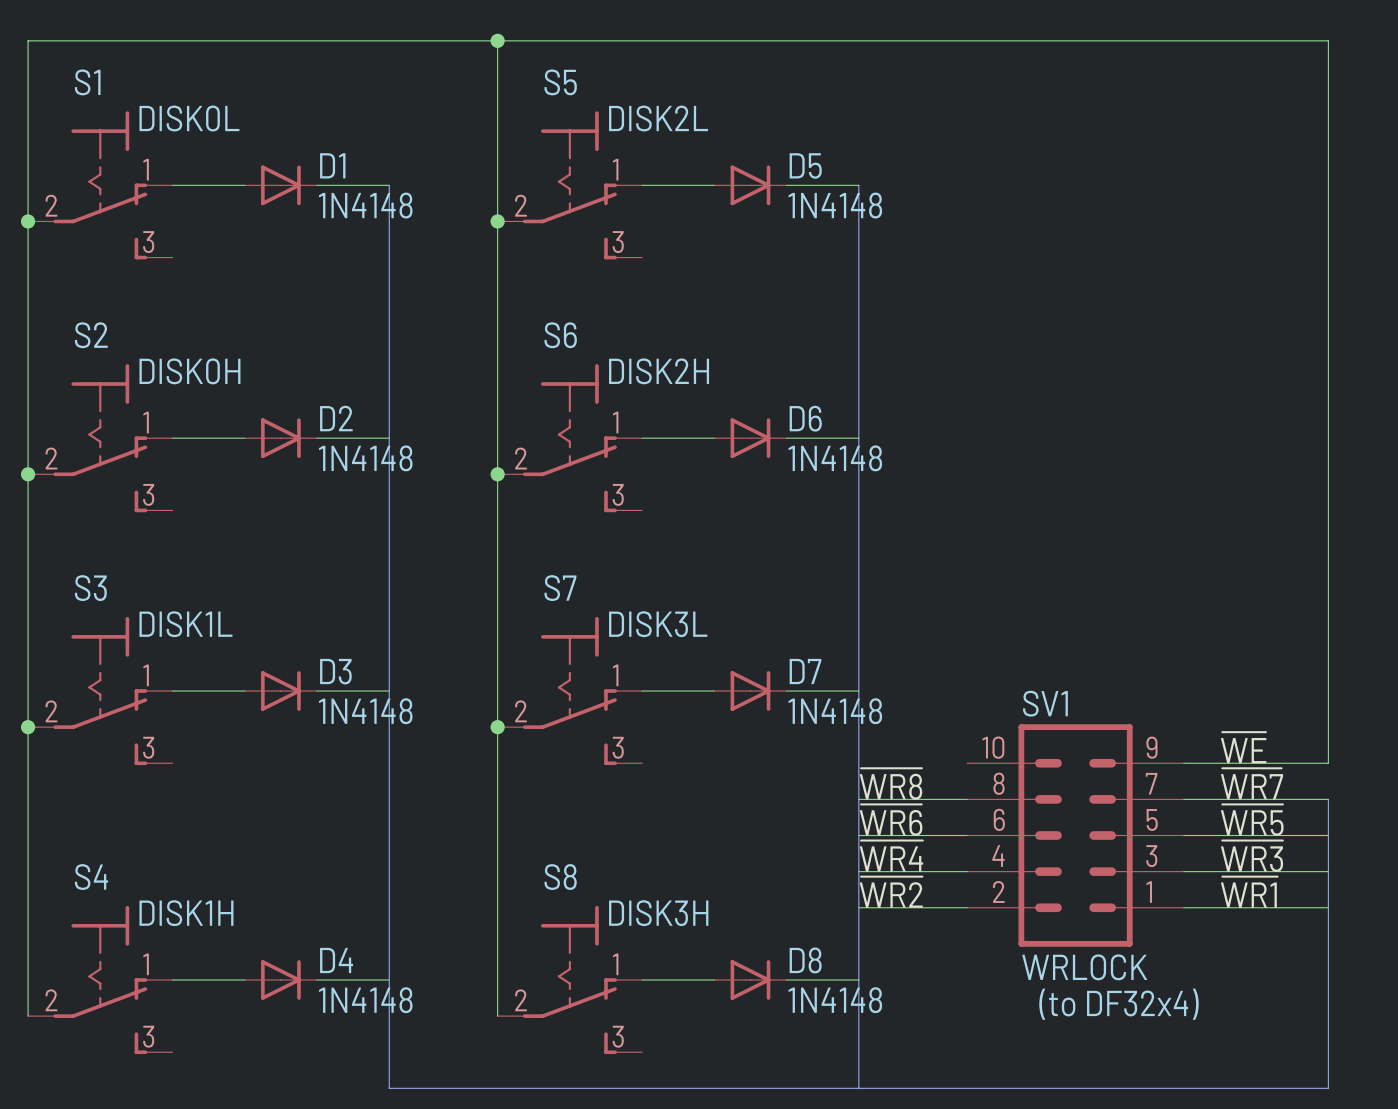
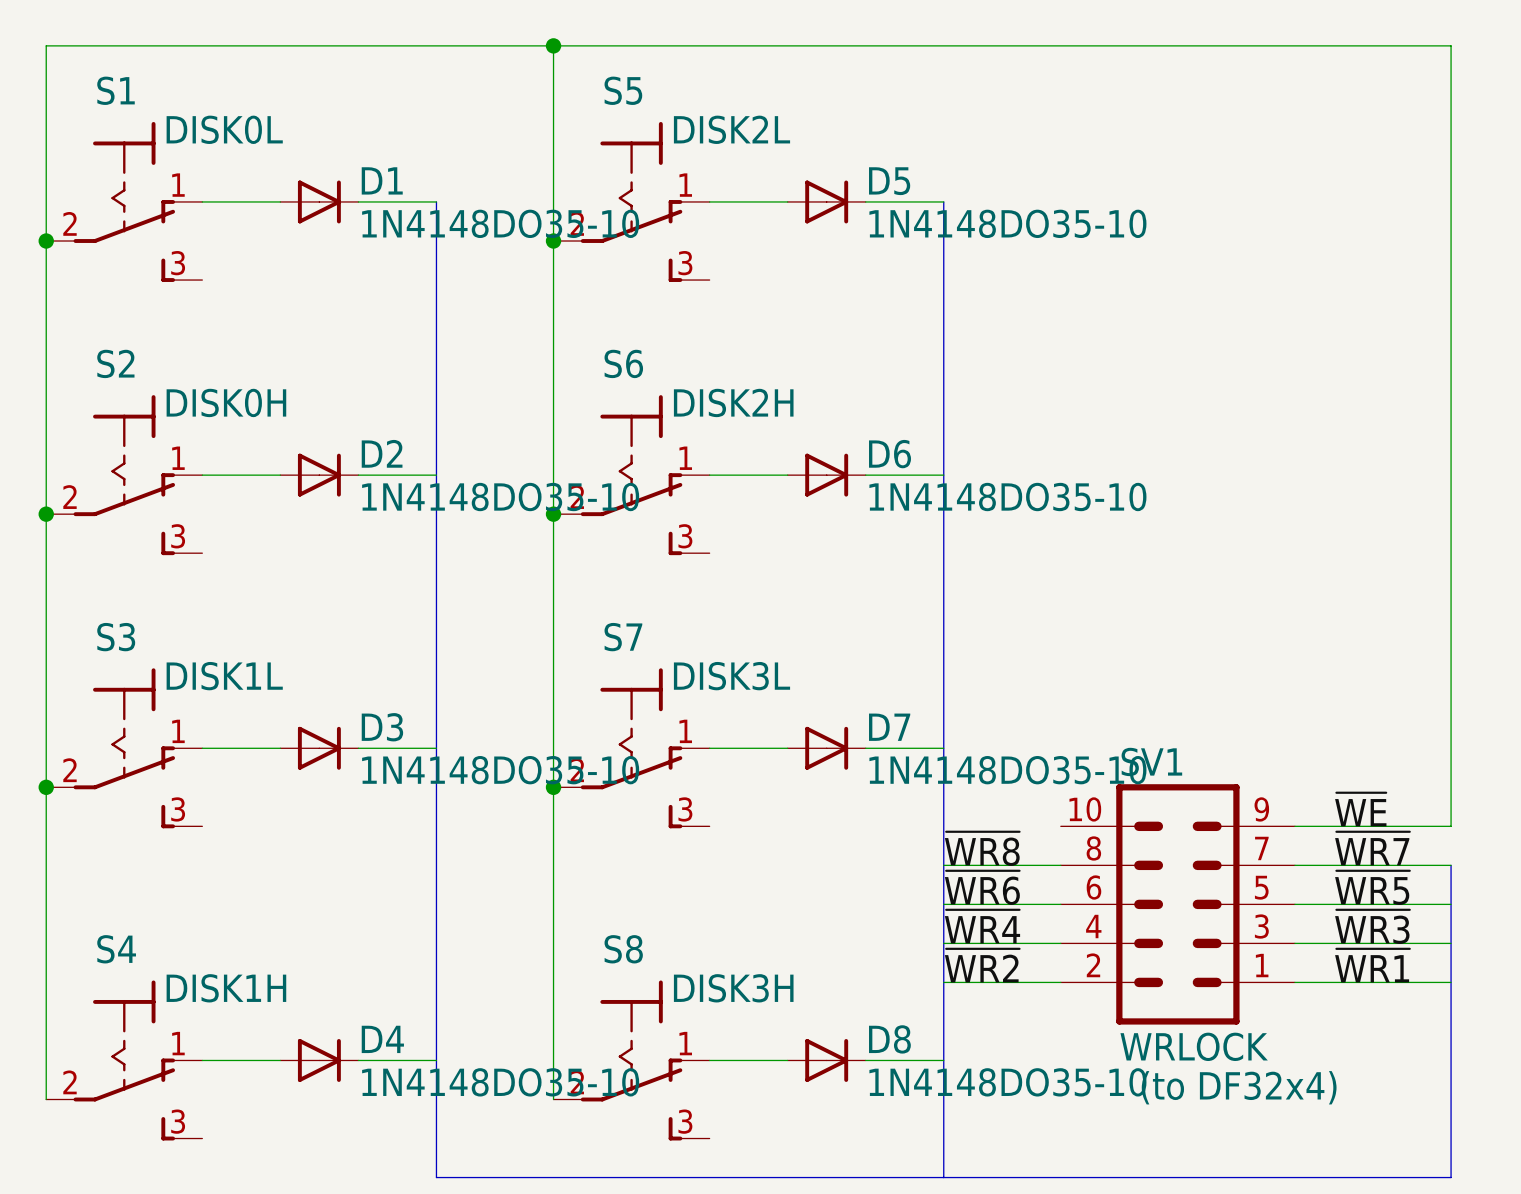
D1 value: 1N4148 (365, 205) -> 1N4148DO35-10 (500, 223)
D5 value: 1N4148 (835, 205) -> 1N4148DO35-10 (1007, 223)
D2 value: 1N4148 (365, 458) -> 1N4148DO35-10 (500, 497)
D6 value: 1N4148 (835, 458) -> 1N4148DO35-10 (1007, 497)
D3 value: 1N4148 (365, 711) -> 1N4148DO35-10 (500, 770)
D7 value: 1N4148 (835, 711) -> 1N4148DO35-10 (1007, 770)
D4 value: 1N4148 (365, 1000) -> 1N4148DO35-10 (500, 1082)
D8 value: 1N4148 (835, 1000) -> 1N4148DO35-10 (1007, 1082)

